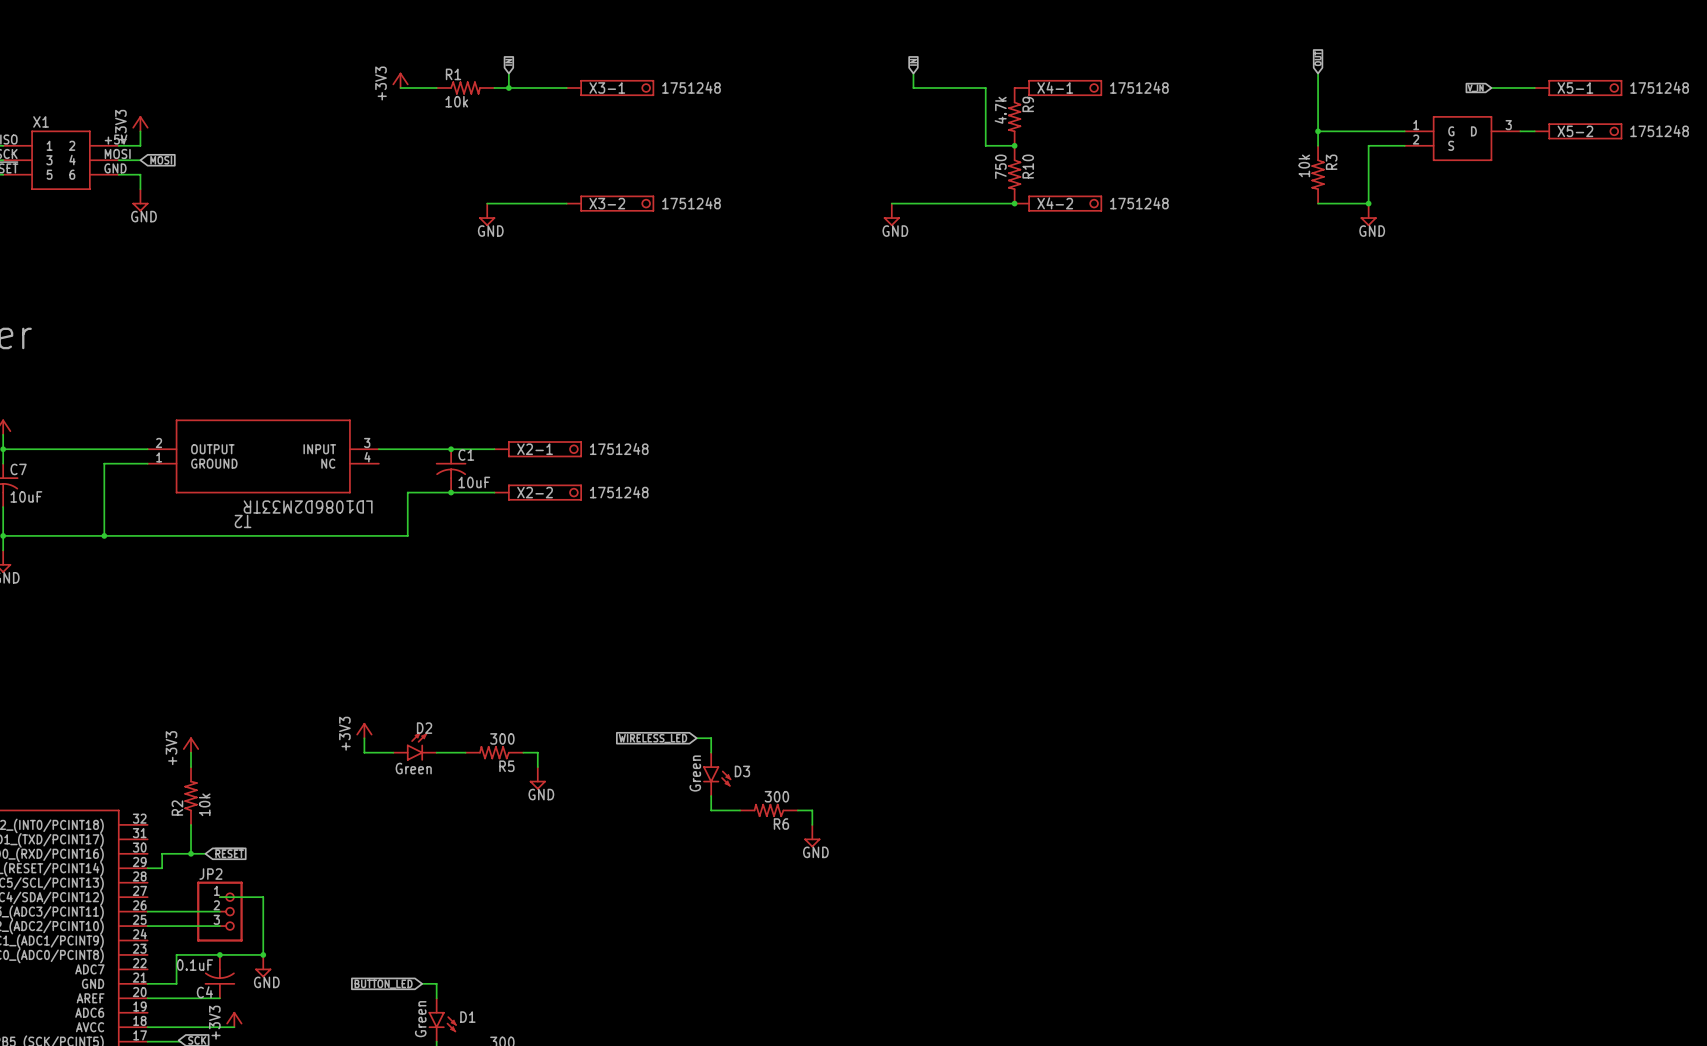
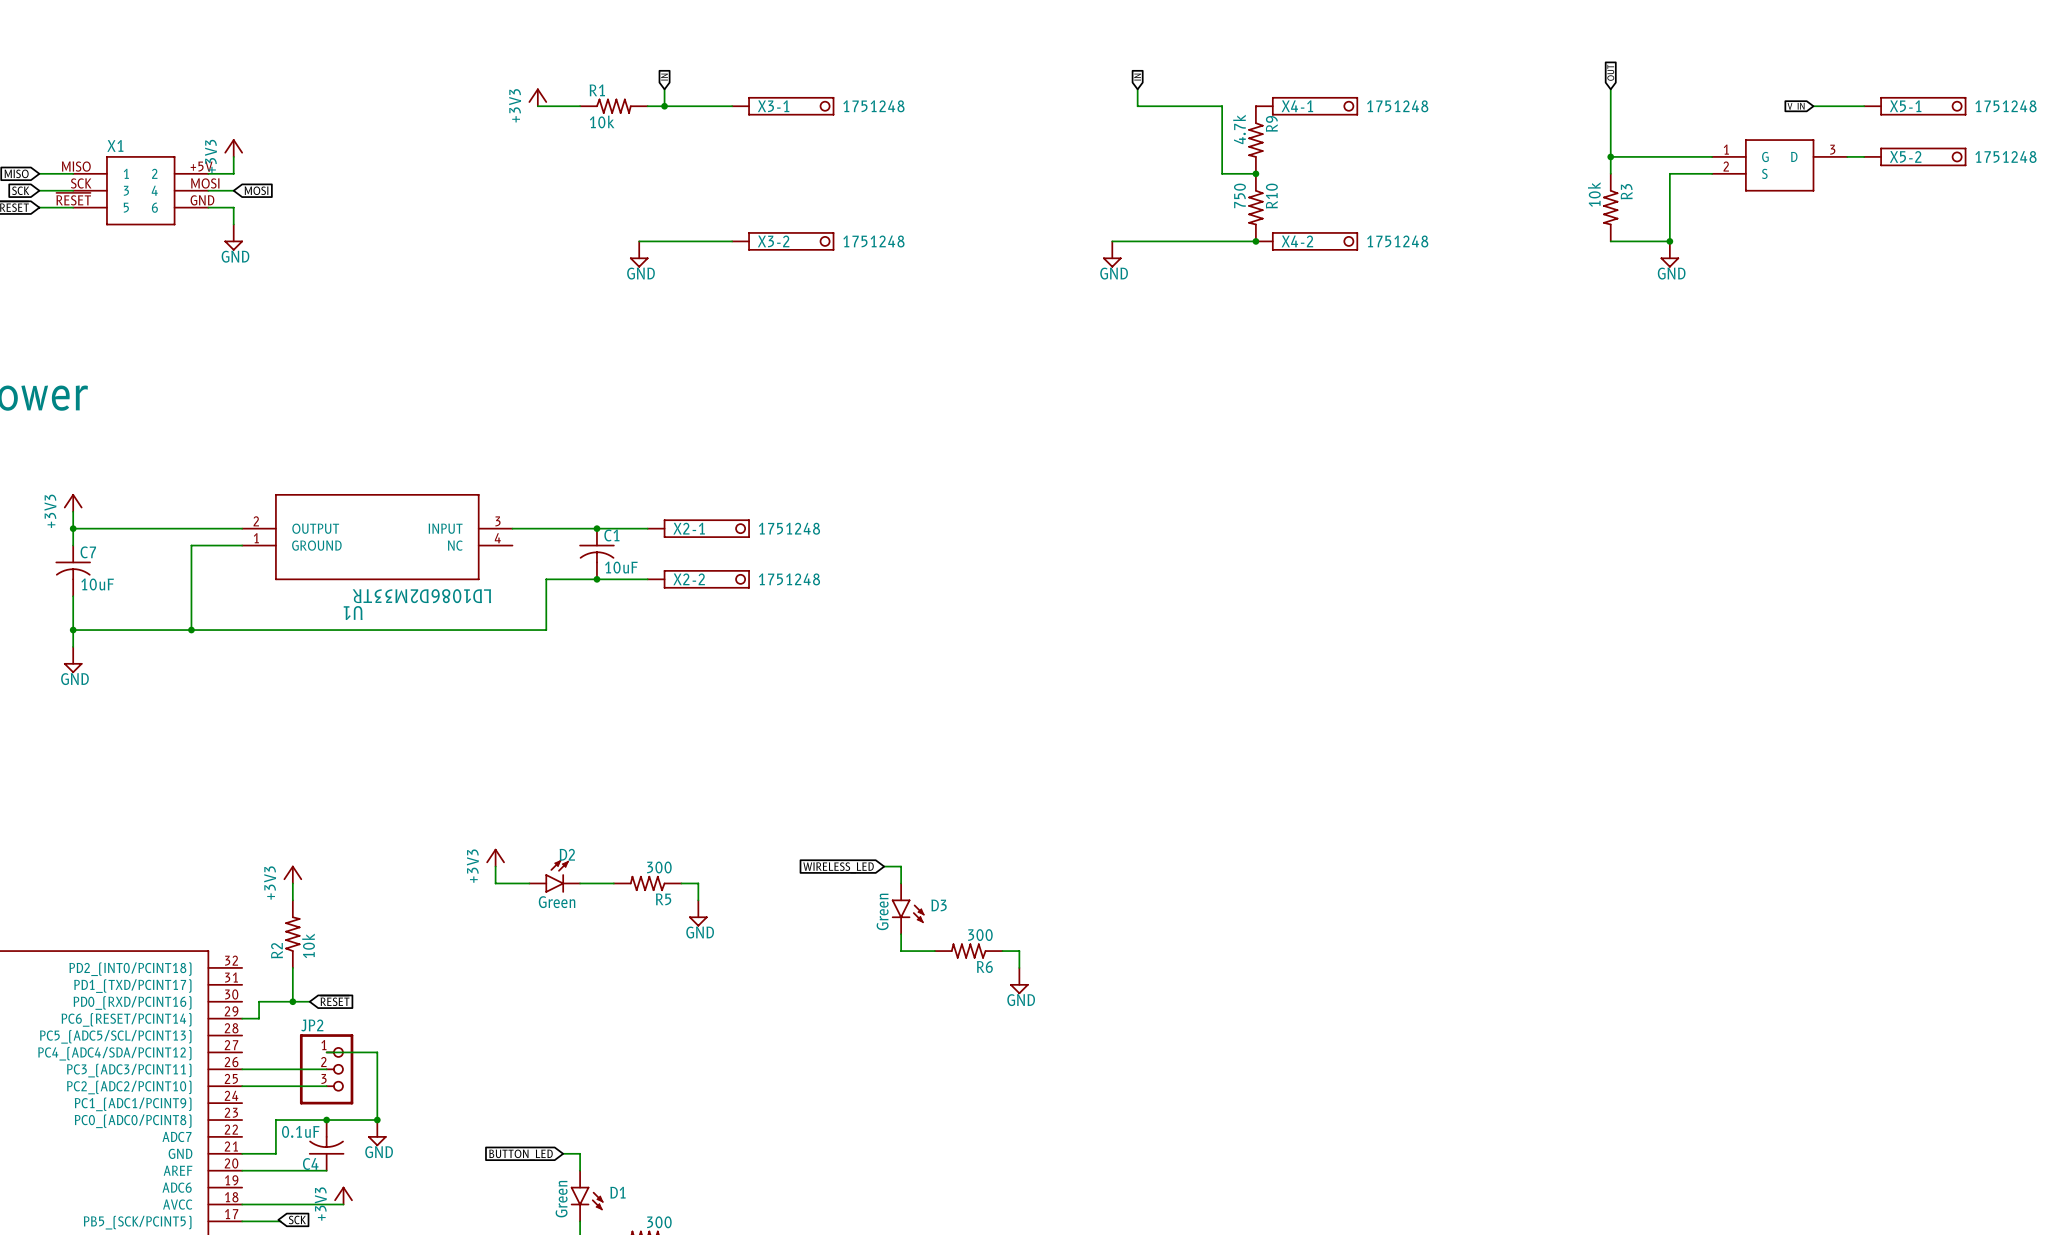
T2 name: T2 (243, 521) -> U1 (353, 613)

